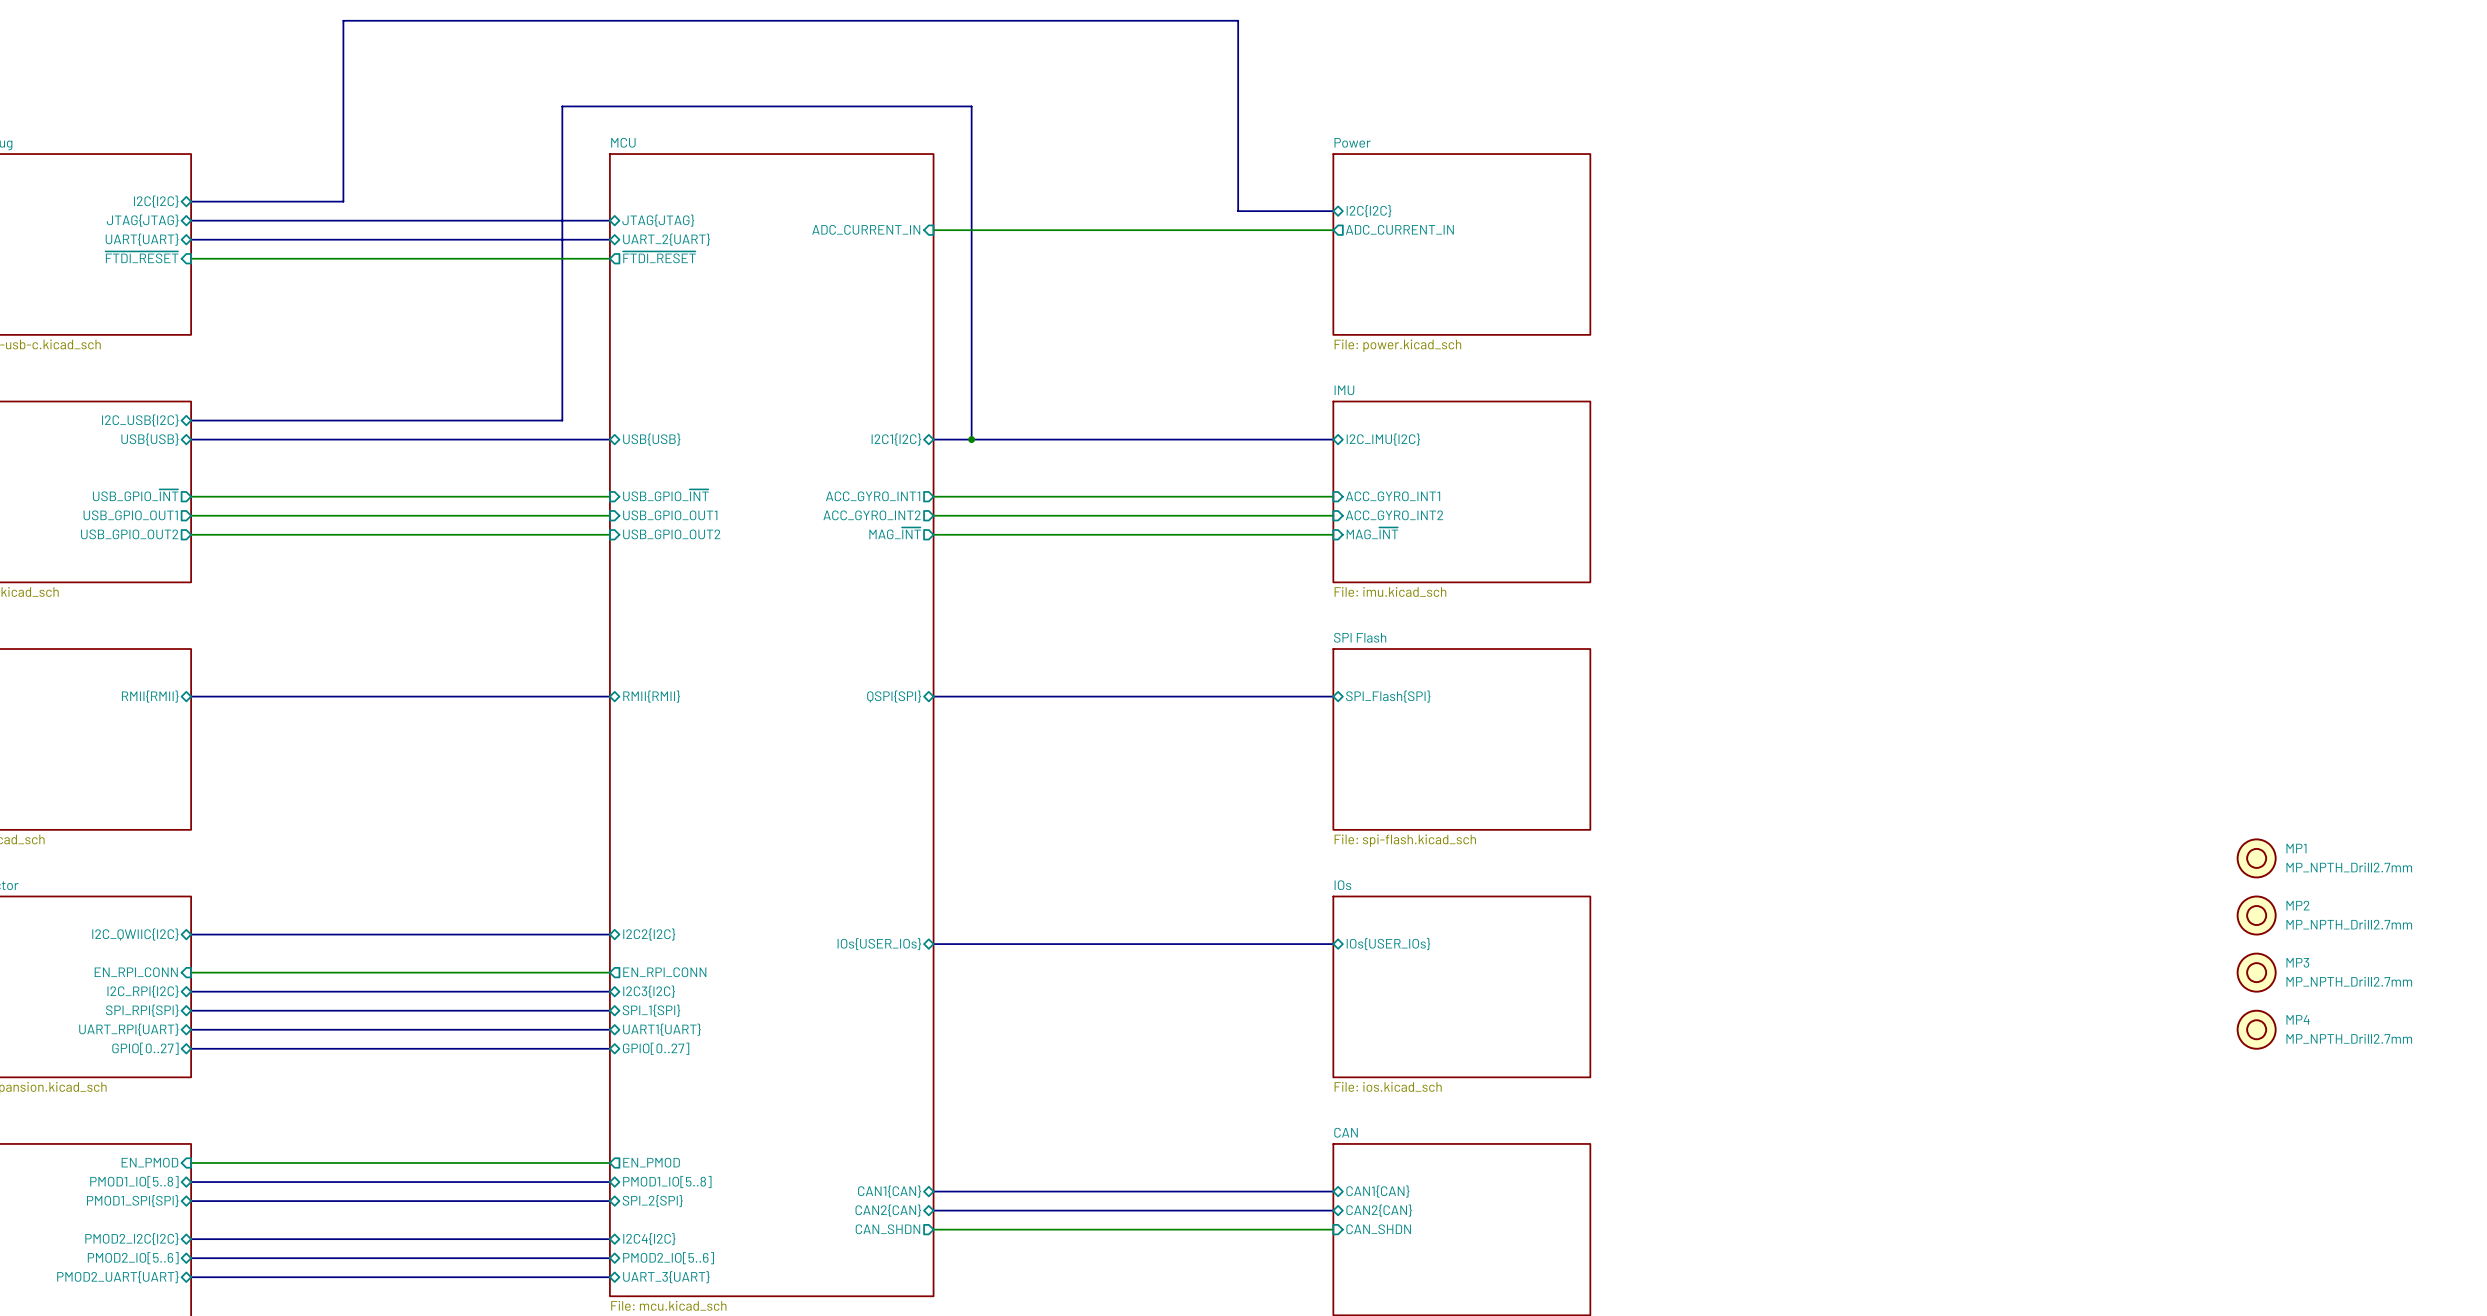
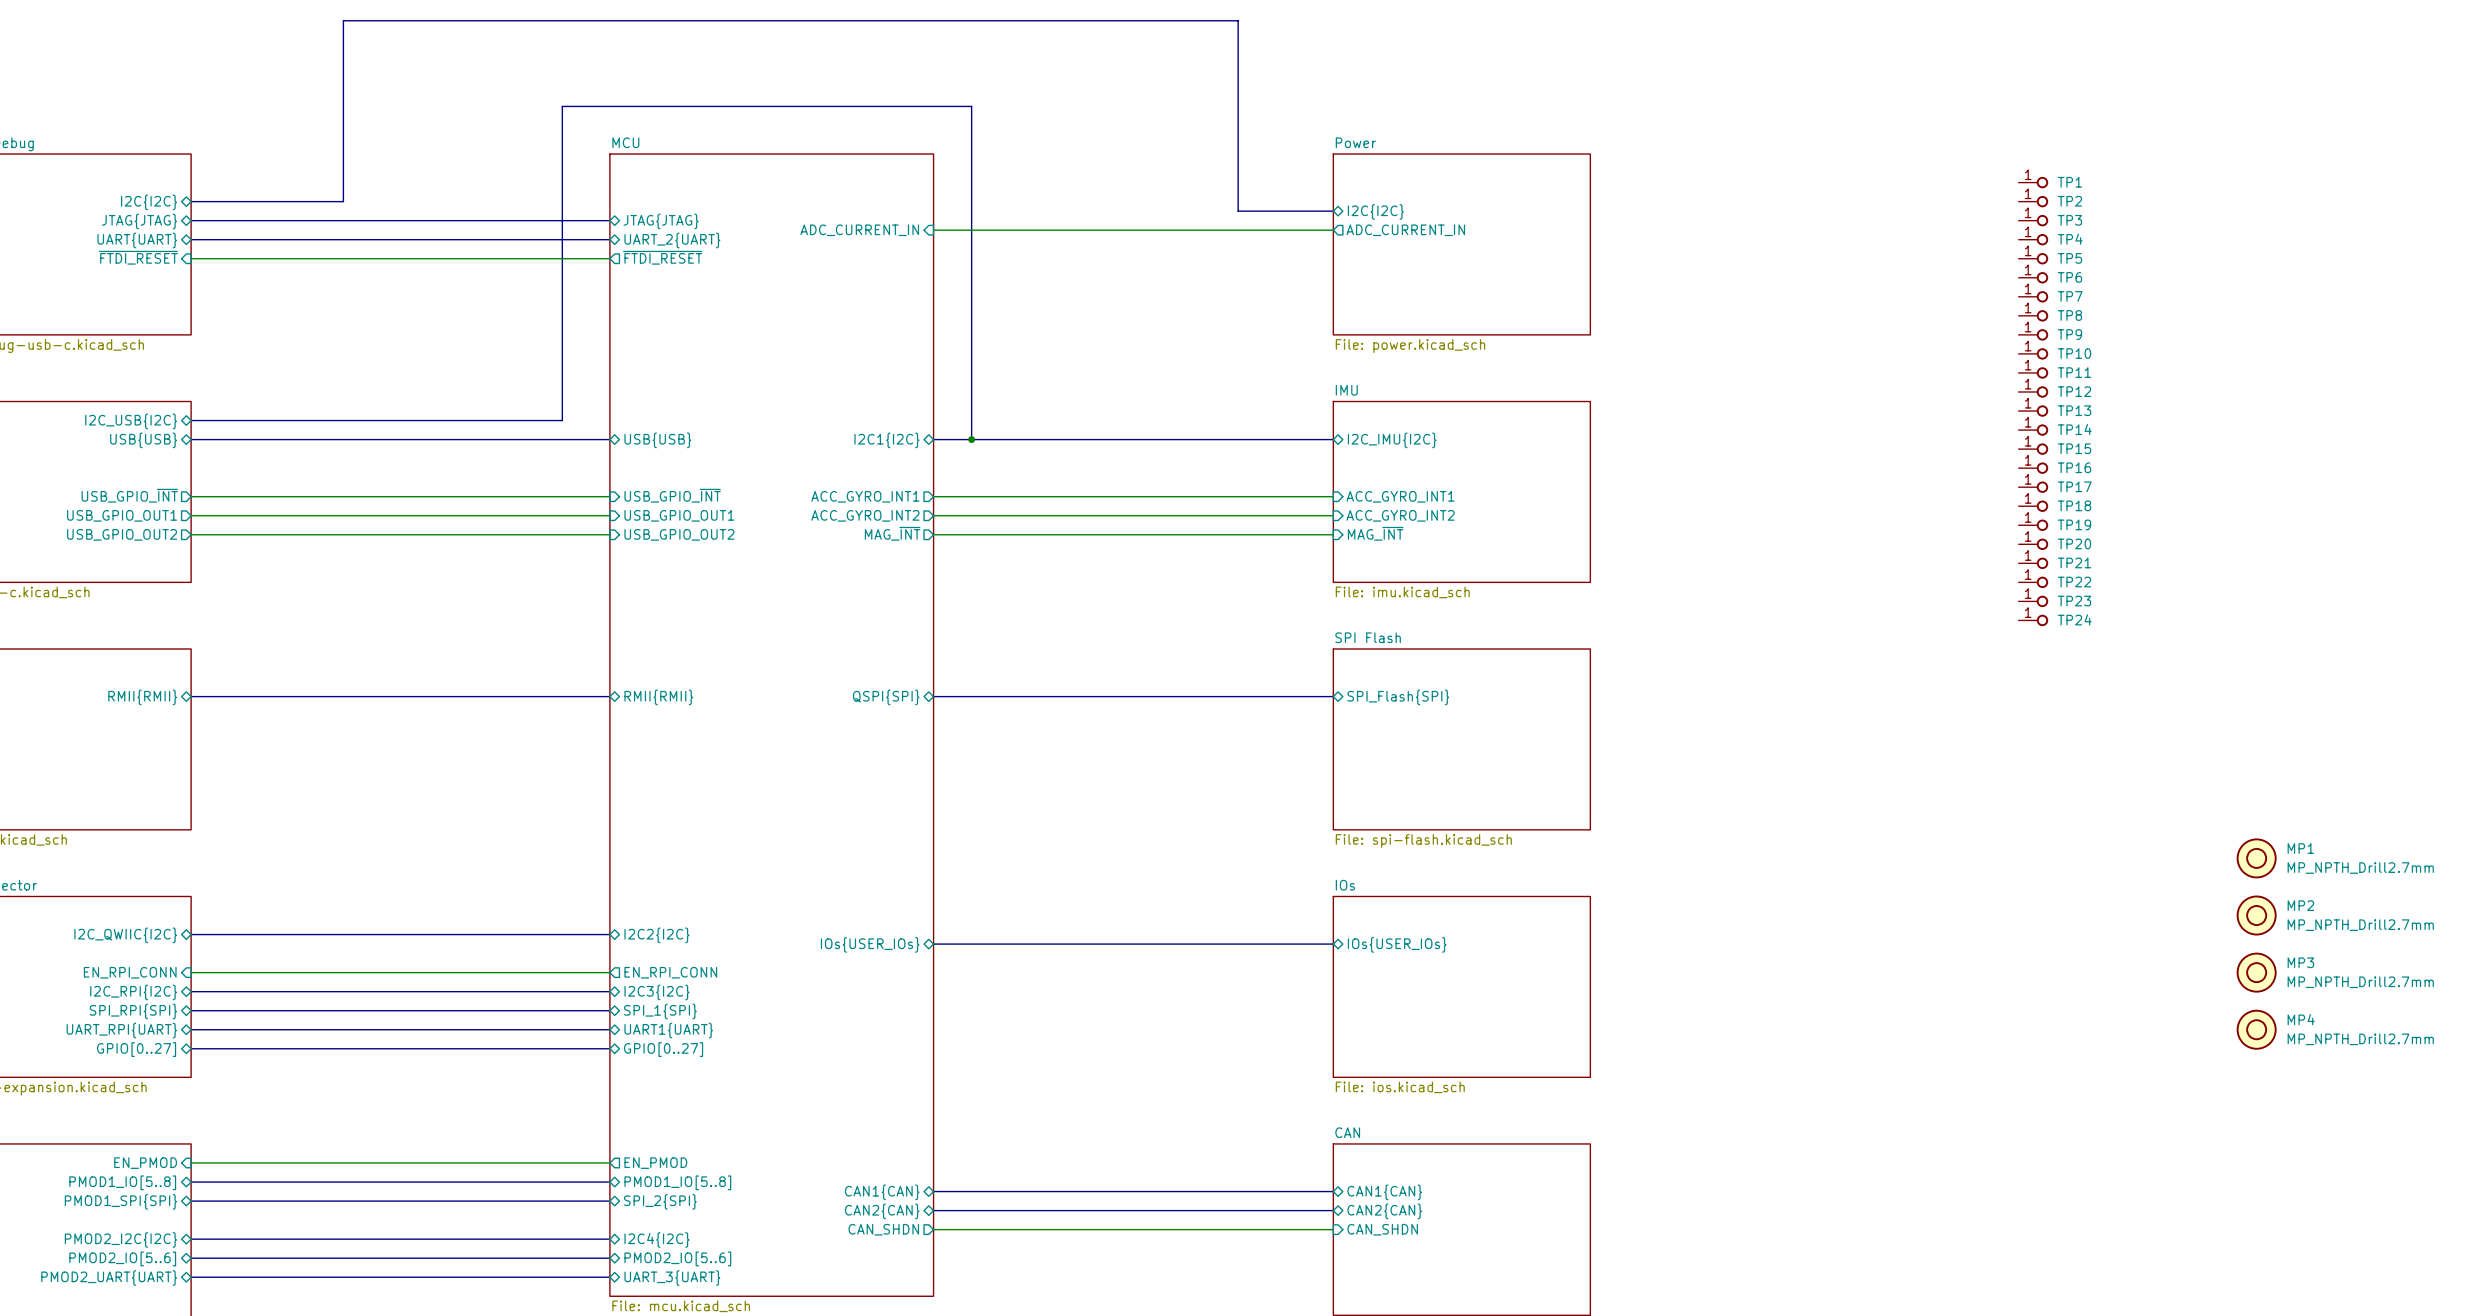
TP1: none -> (2033, 182)
TP2: none -> (2033, 201)
TP3: none -> (2033, 220)
TP4: none -> (2033, 239)
TP5: none -> (2033, 258)
TP6: none -> (2033, 277)
TP7: none -> (2033, 296)
TP8: none -> (2033, 315)
TP9: none -> (2033, 334)
TP10: none -> (2033, 353)
TP11: none -> (2033, 372)
TP12: none -> (2033, 391)
TP13: none -> (2033, 411)
TP14: none -> (2033, 430)
TP15: none -> (2033, 449)
TP16: none -> (2033, 468)
TP17: none -> (2033, 487)
TP18: none -> (2033, 506)
TP19: none -> (2033, 525)
TP20: none -> (2033, 544)
TP21: none -> (2033, 563)
TP22: none -> (2033, 582)
TP23: none -> (2033, 601)
TP24: none -> (2033, 620)

